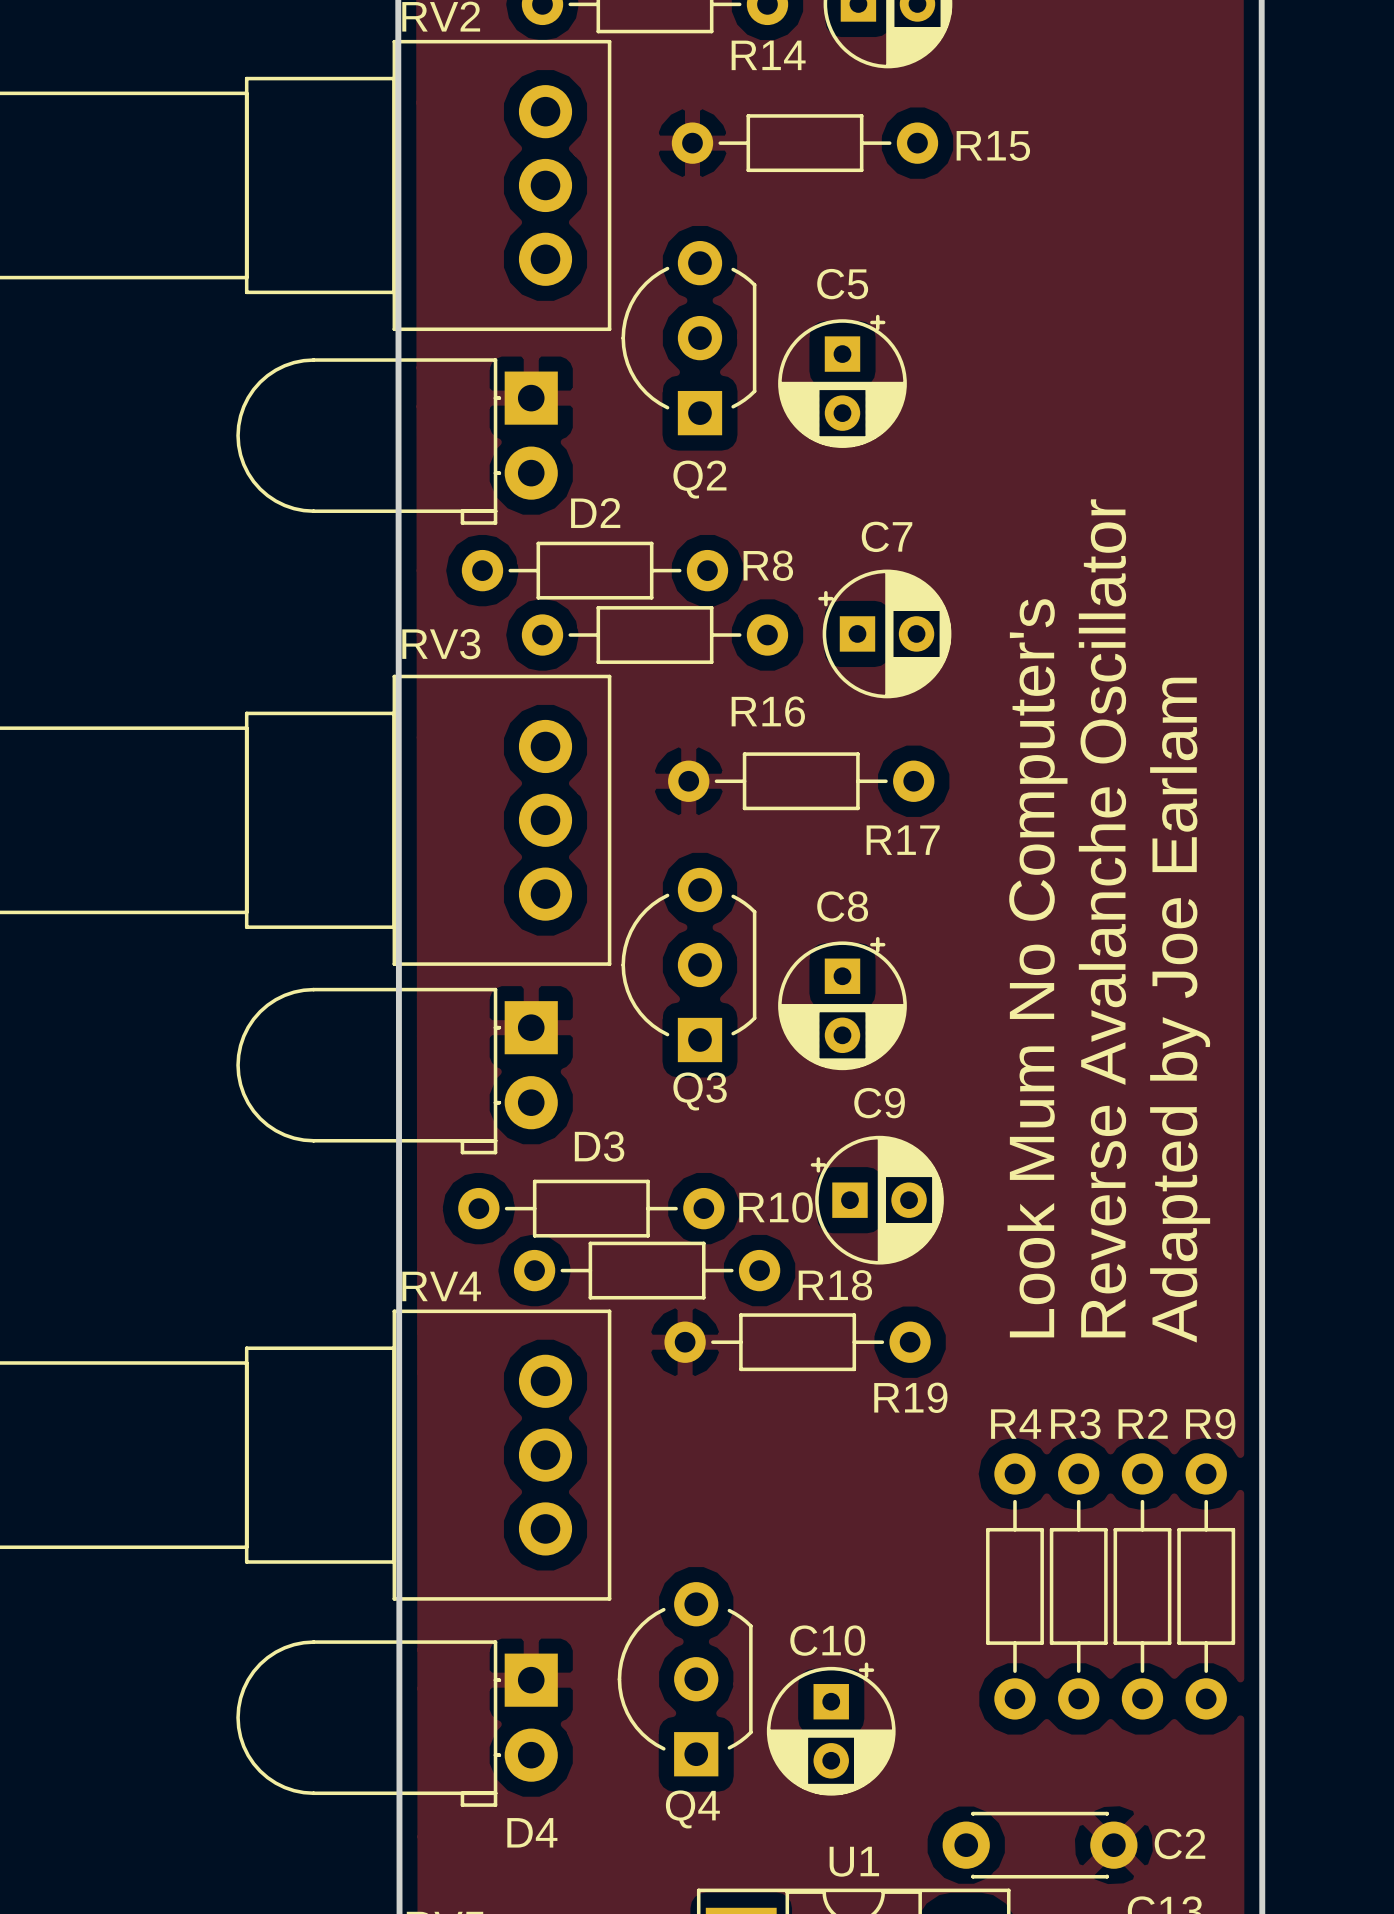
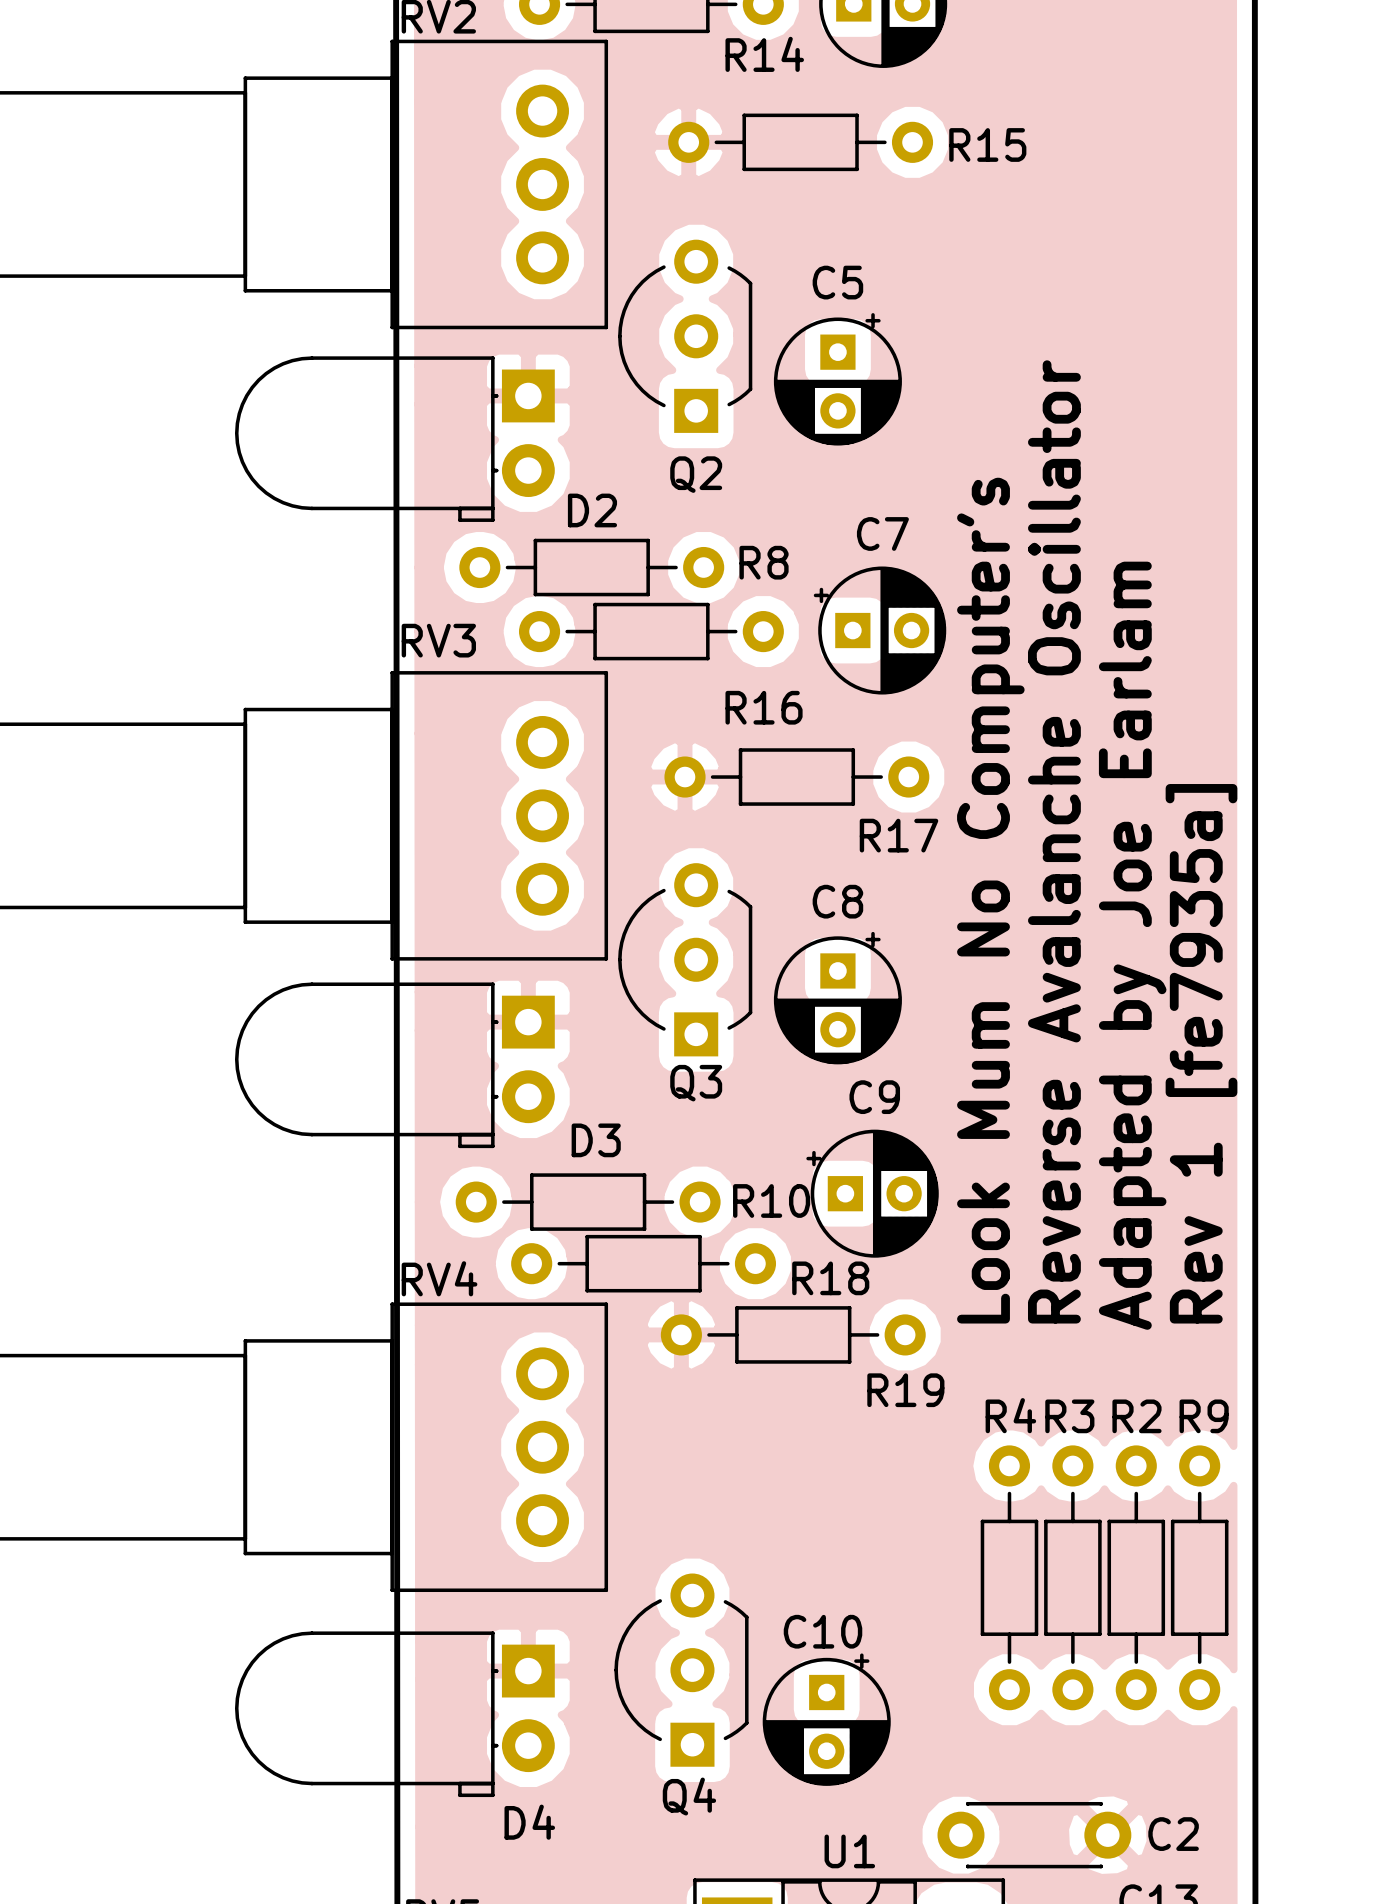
text position: Reverse Avalanche Oscillator (1102, 918) -> Reverse Avalanche Oscillator (1054, 841)
text position: Look Mum No Computer's (1037, 968) -> Look Mum No Computer's (990, 900)
text position: Adapted by Joe Earlam (1180, 1010) -> Adapted by Joe Earlam (1132, 945)
text: none -> Rev 1 [fe7935a] (1201, 1053)

